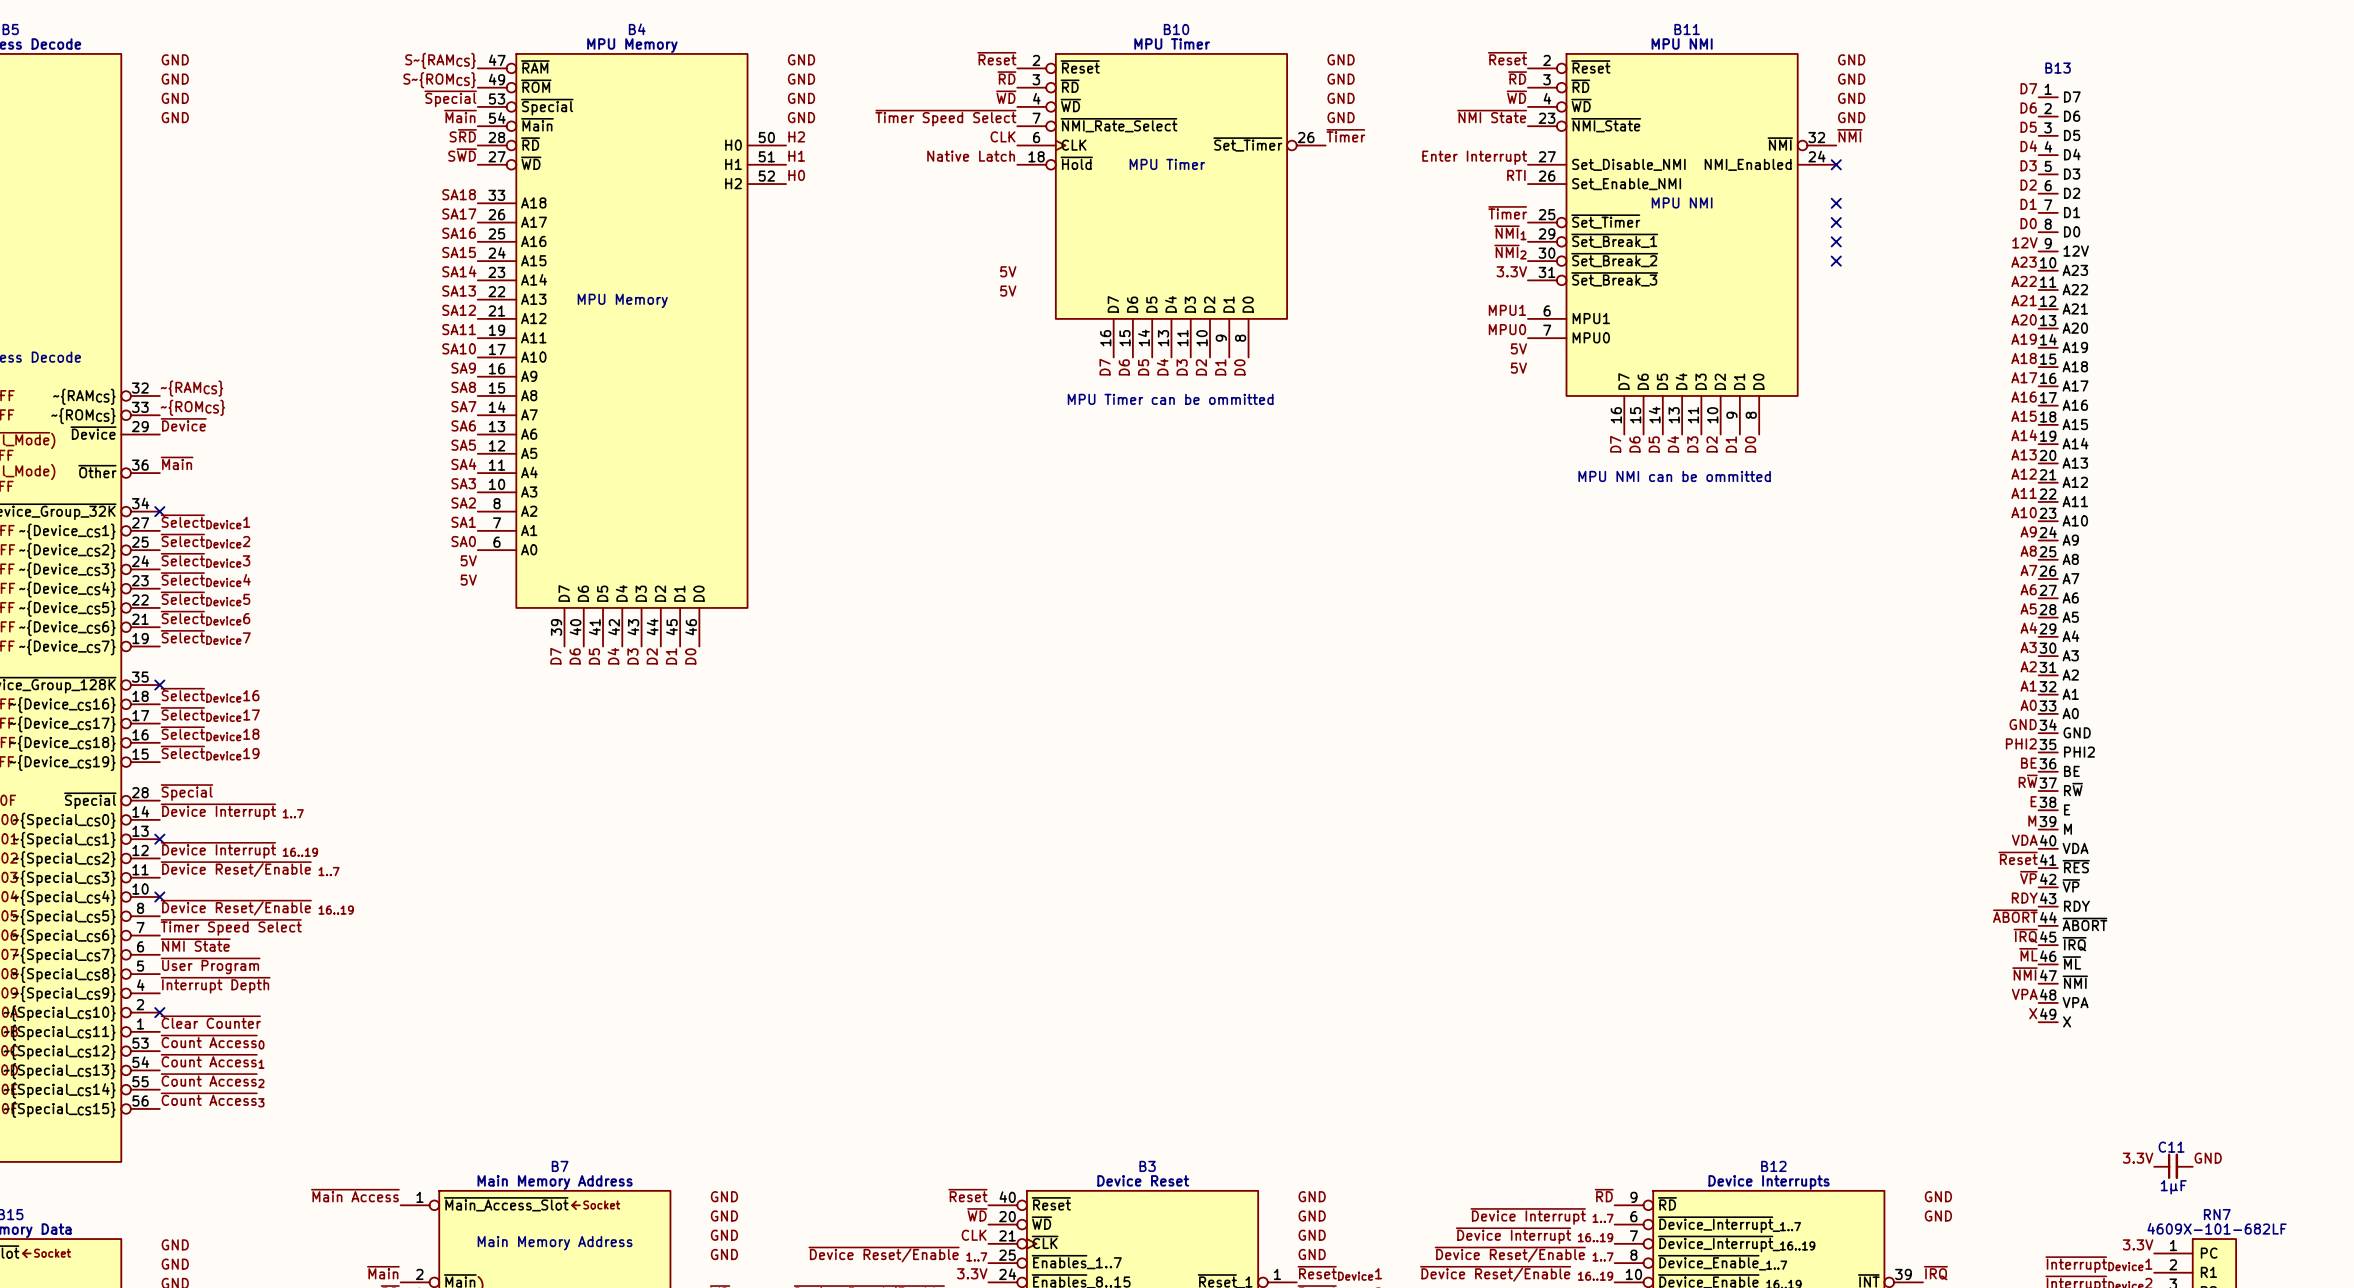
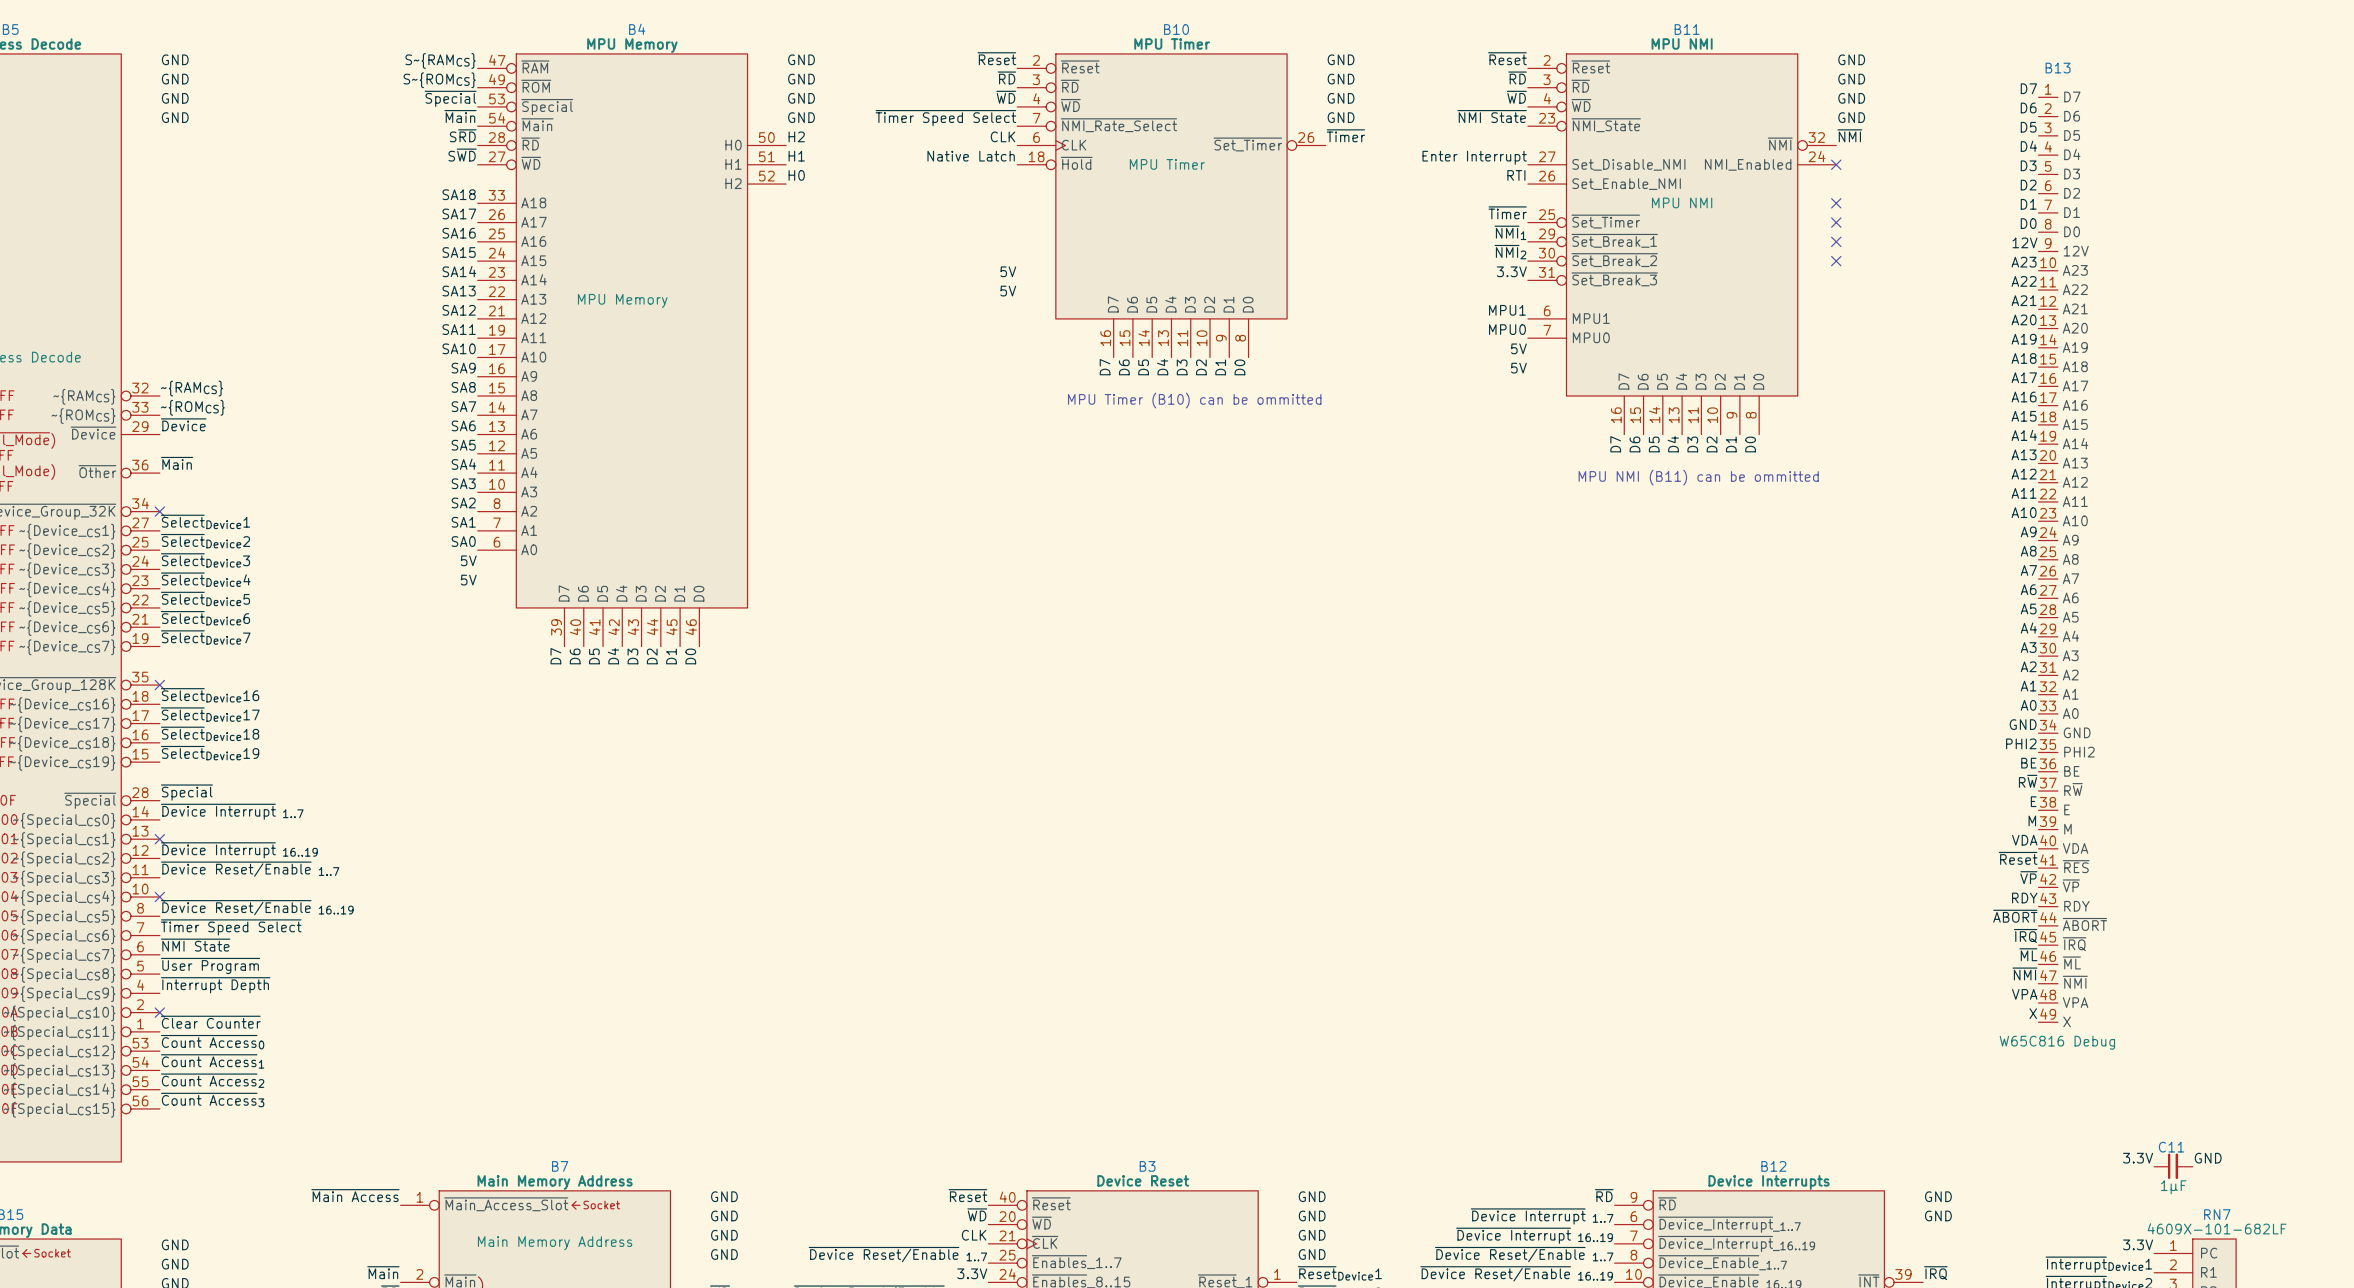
text: MPU Timer can be ommitted (1170, 399) -> MPU Timer (B10) can be ommitted (1194, 400)
text: MPU NMI can be ommitted (1674, 476) -> MPU NMI (B11) can be ommitted (1698, 477)
B13 value: none -> W65C816 Debug (2057, 1042)

